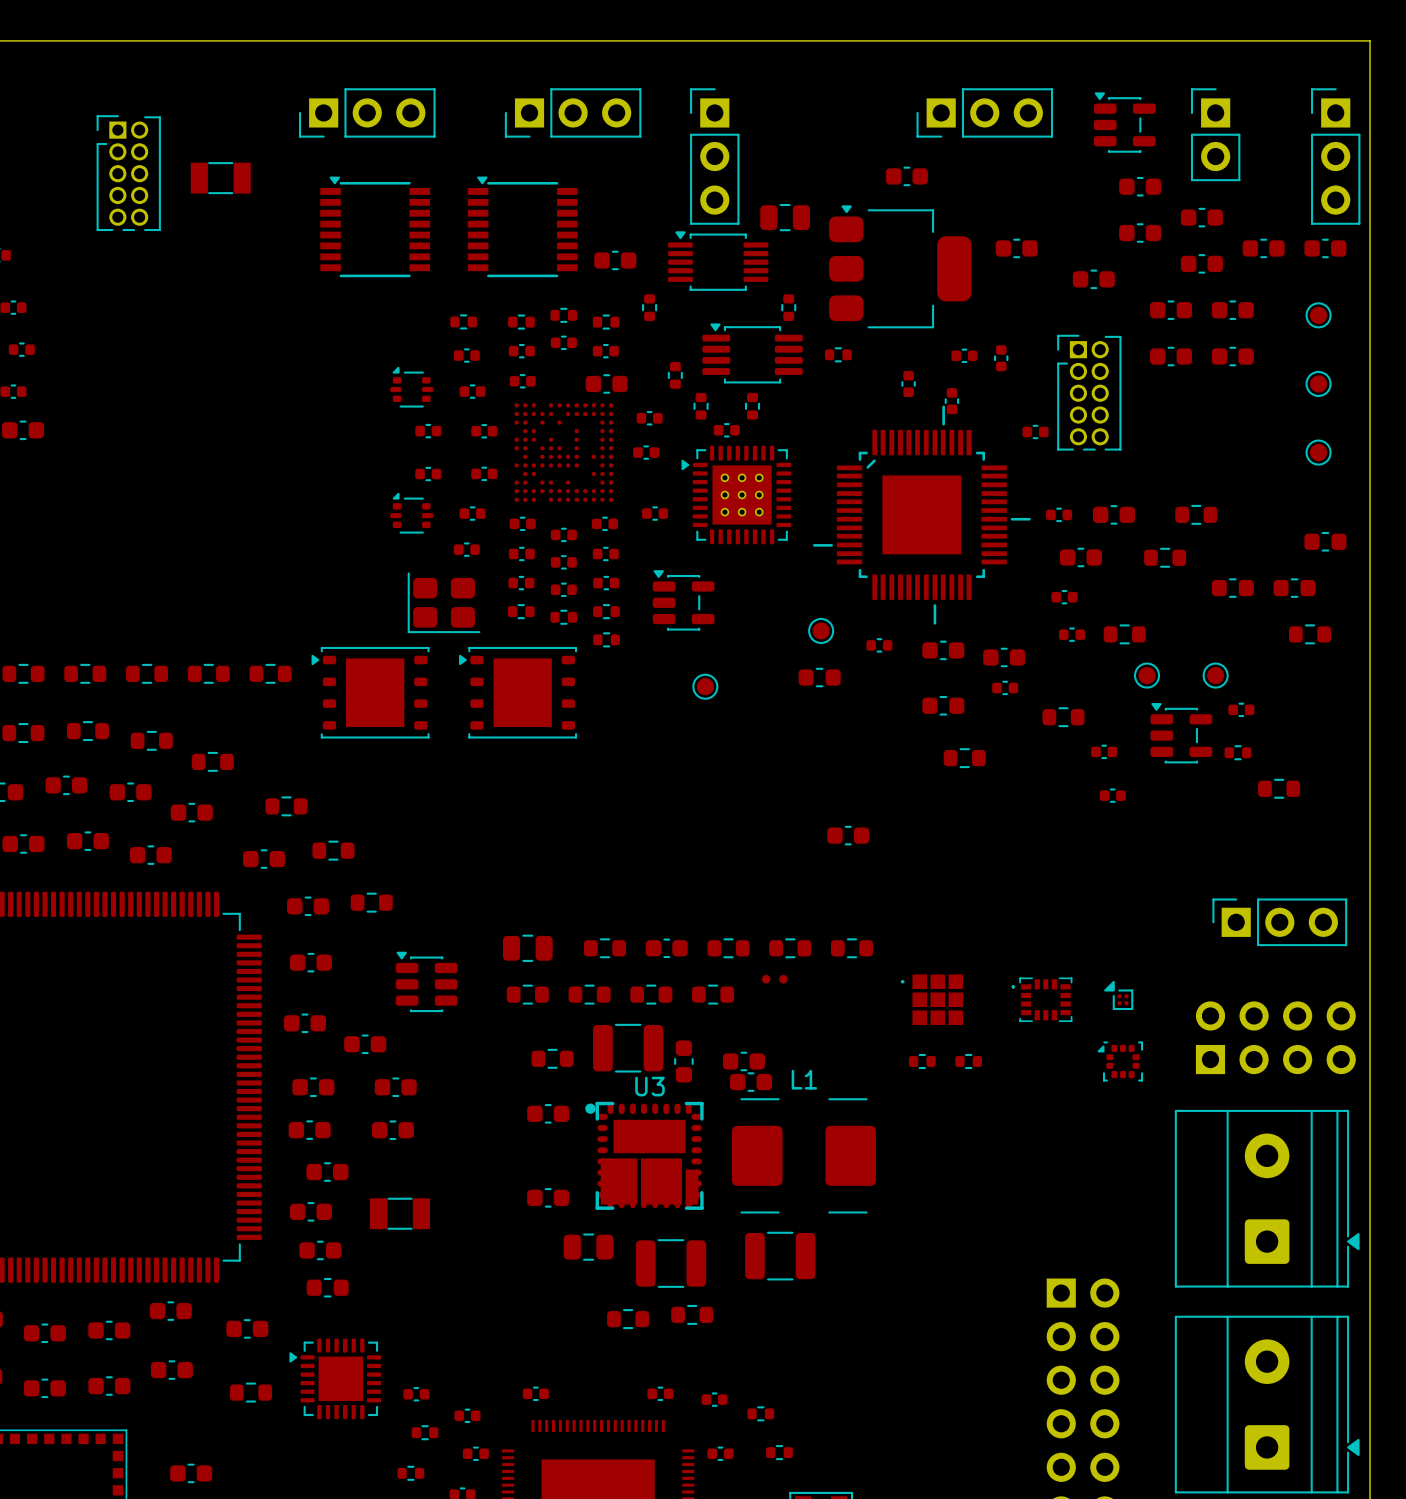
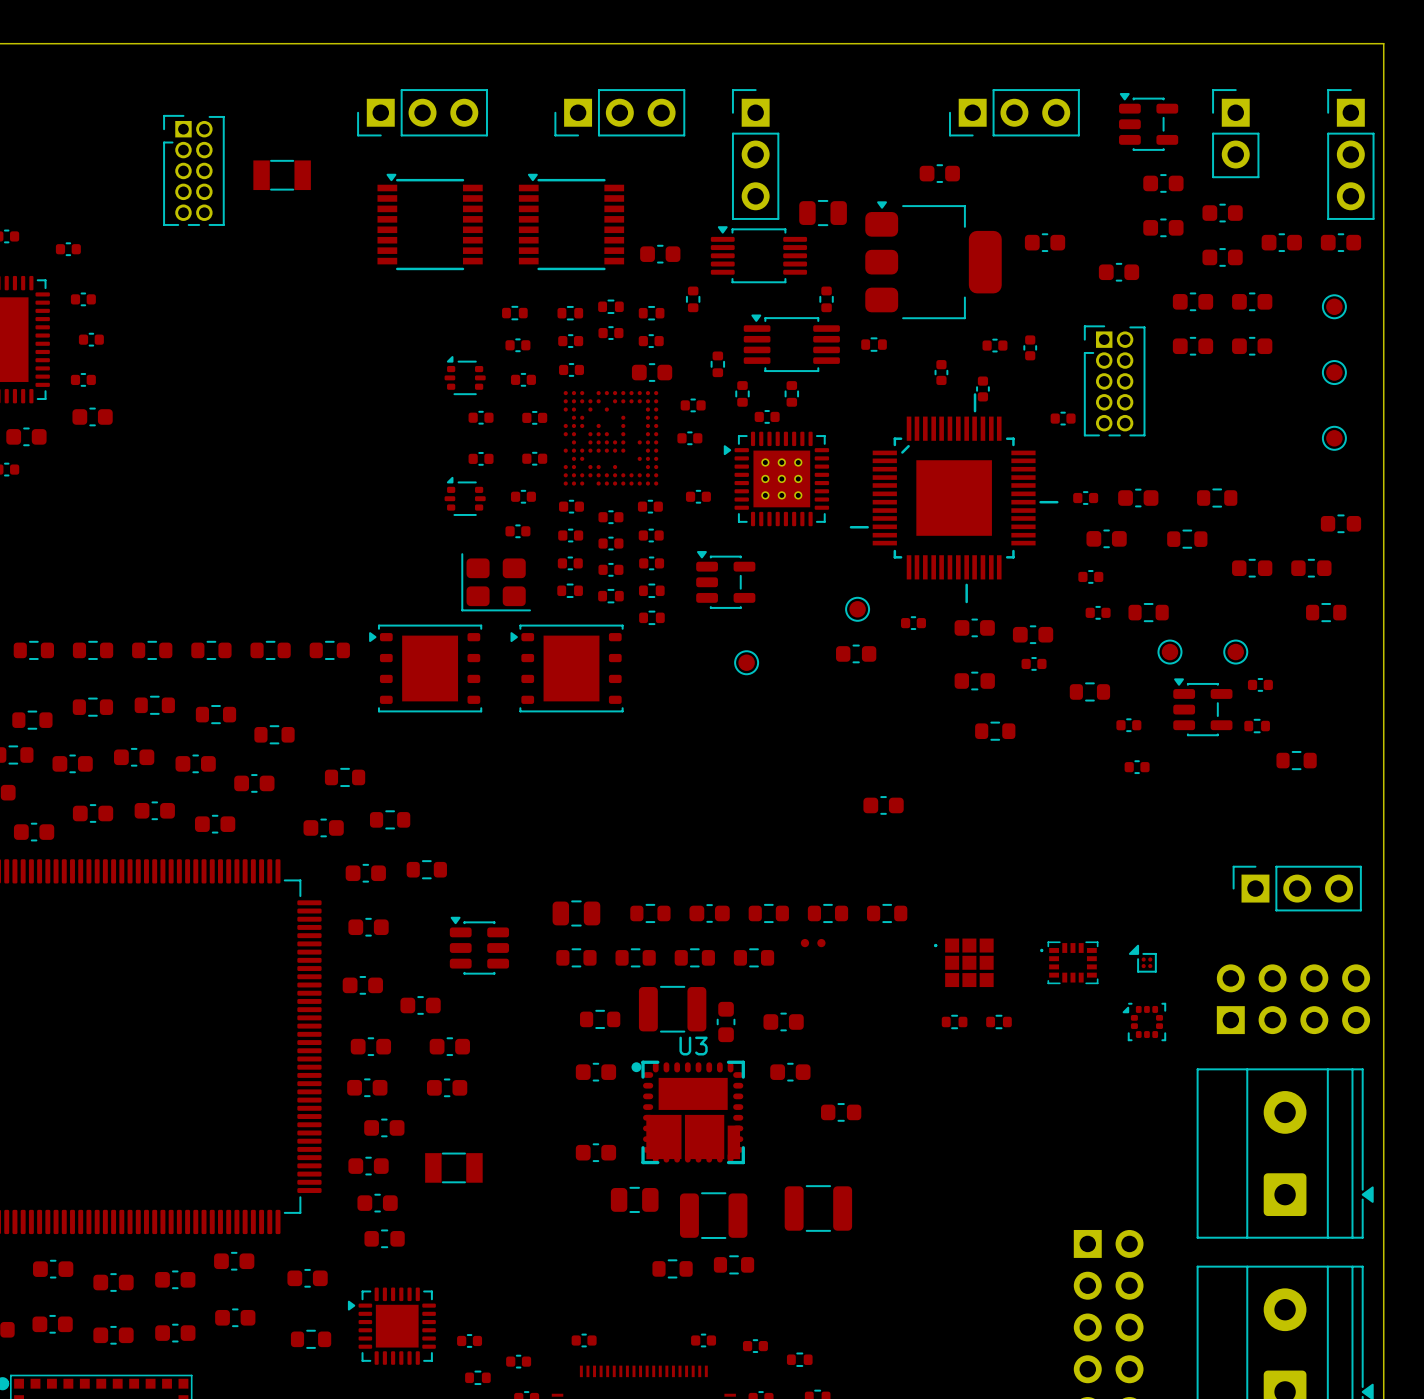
part position: (751, 1082) -> (790, 1072)
L1: (803, 1155) -> none
part: none -> (841, 1112)

